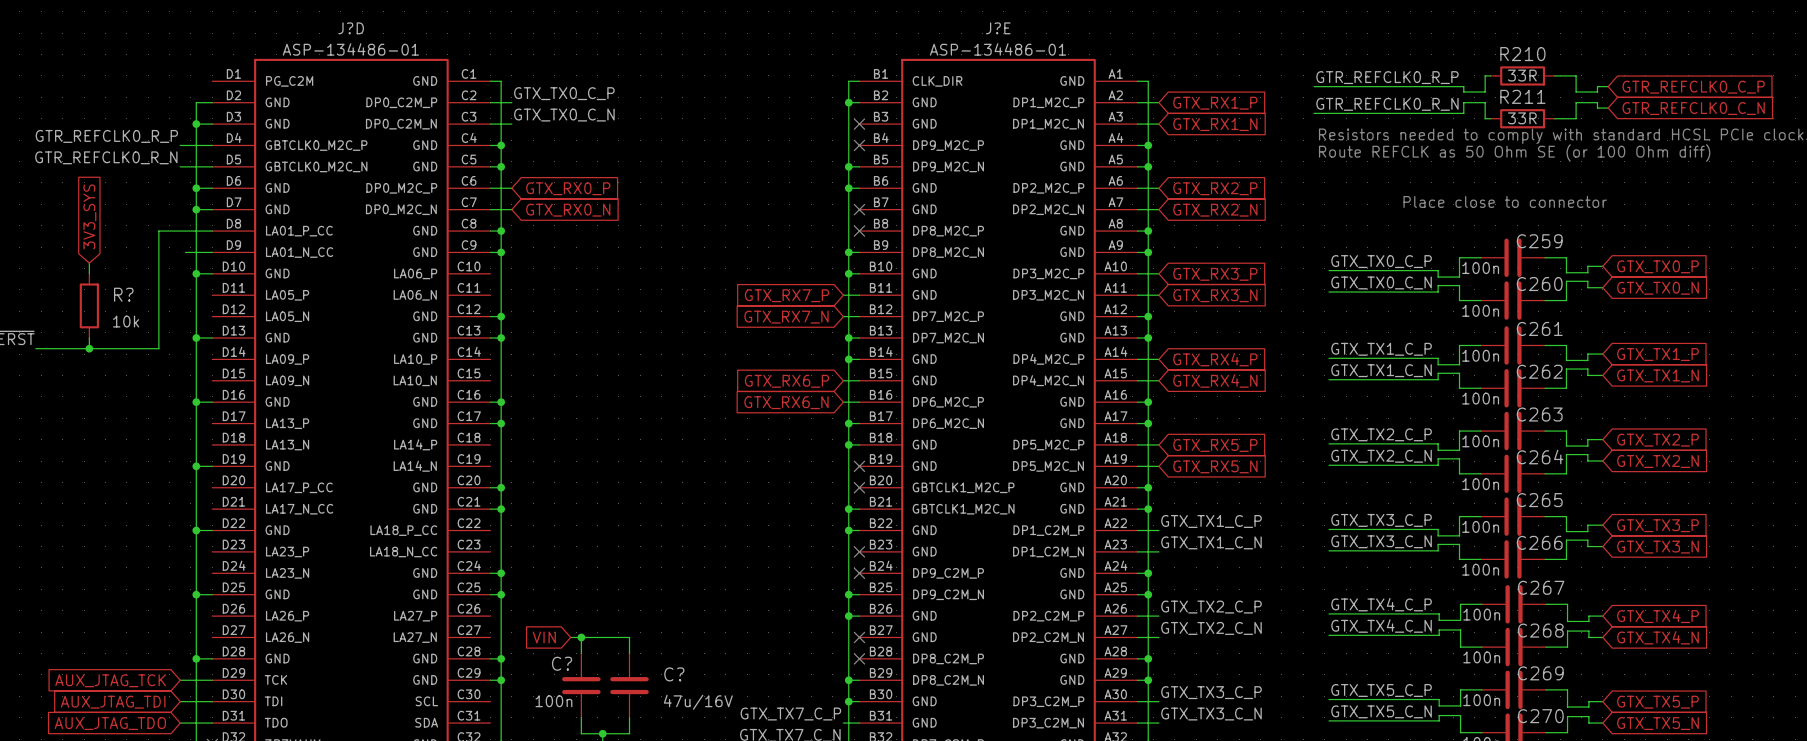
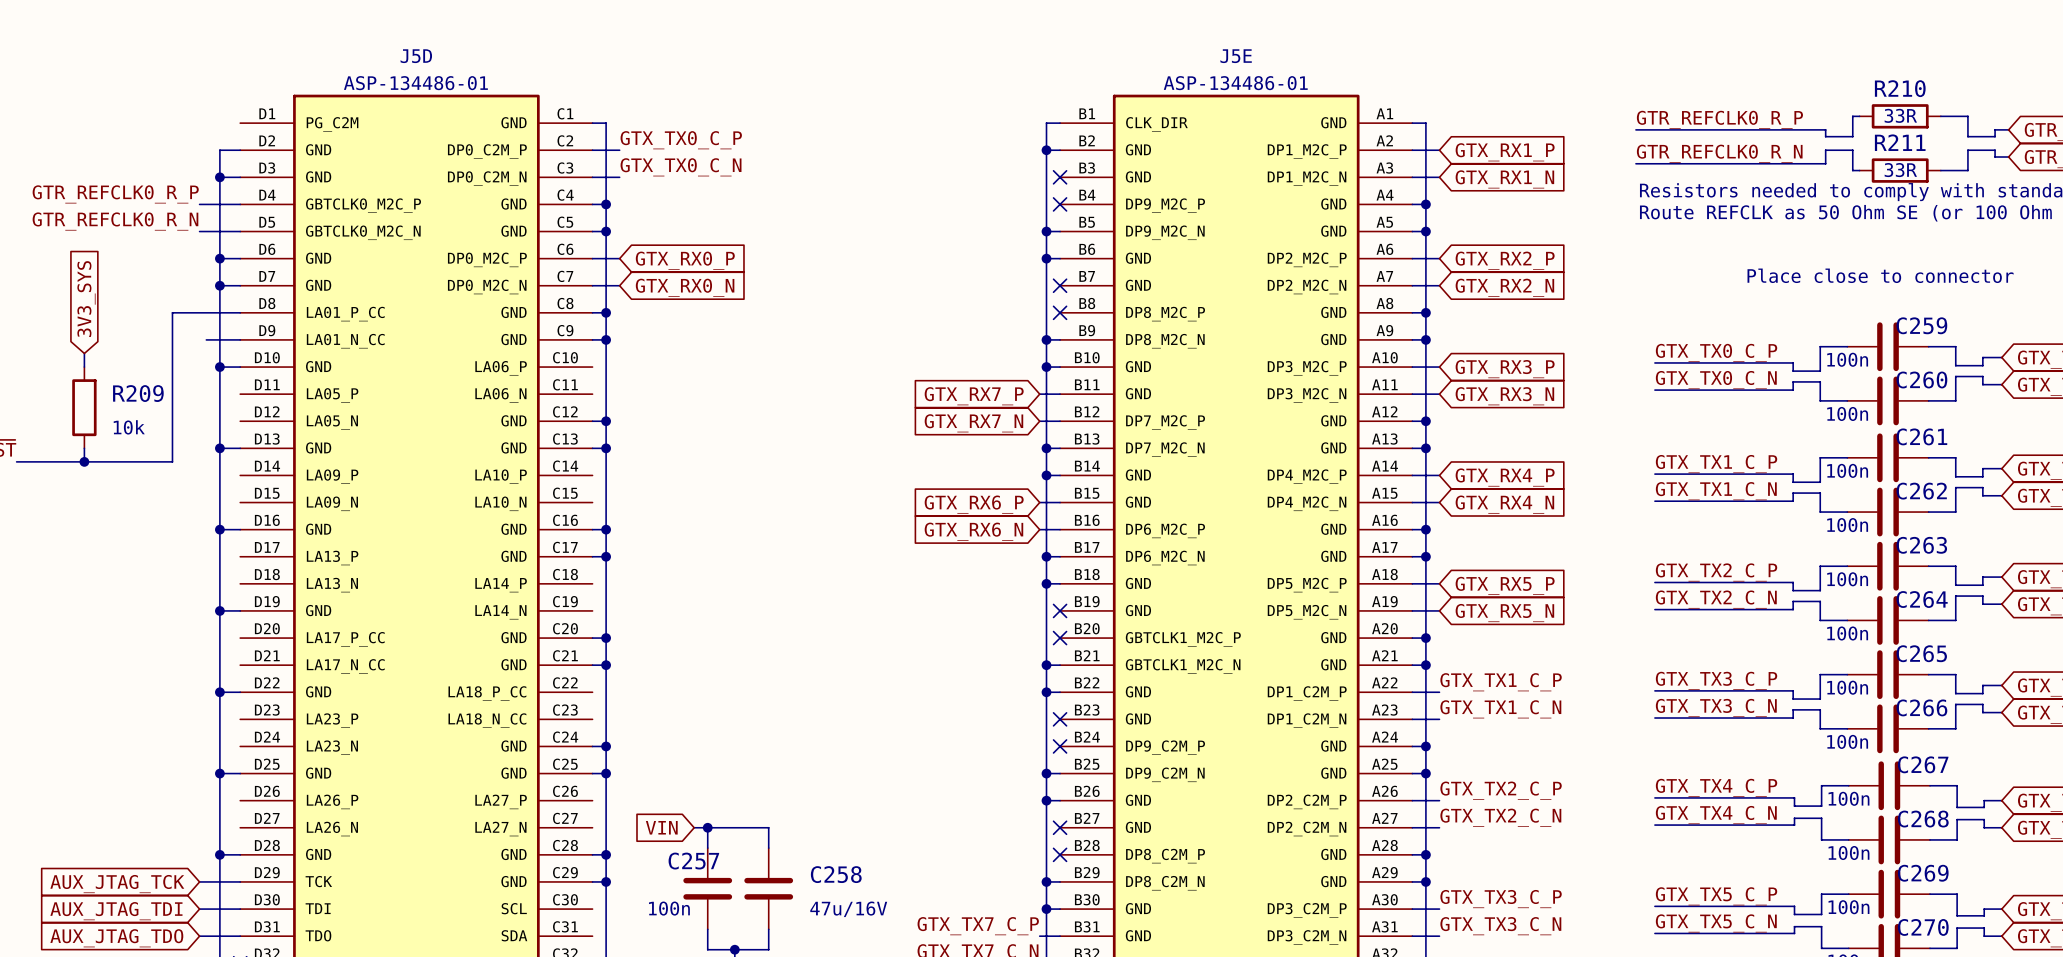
J?D name: J?D (351, 28) -> J5D (416, 56)
J?E name: J?E (998, 28) -> J5E (1236, 56)
R? name: R? (123, 294) -> R209 (138, 393)
C? name: C? (562, 663) -> C257 (693, 861)
C? name: C? (674, 674) -> C258 (836, 874)

